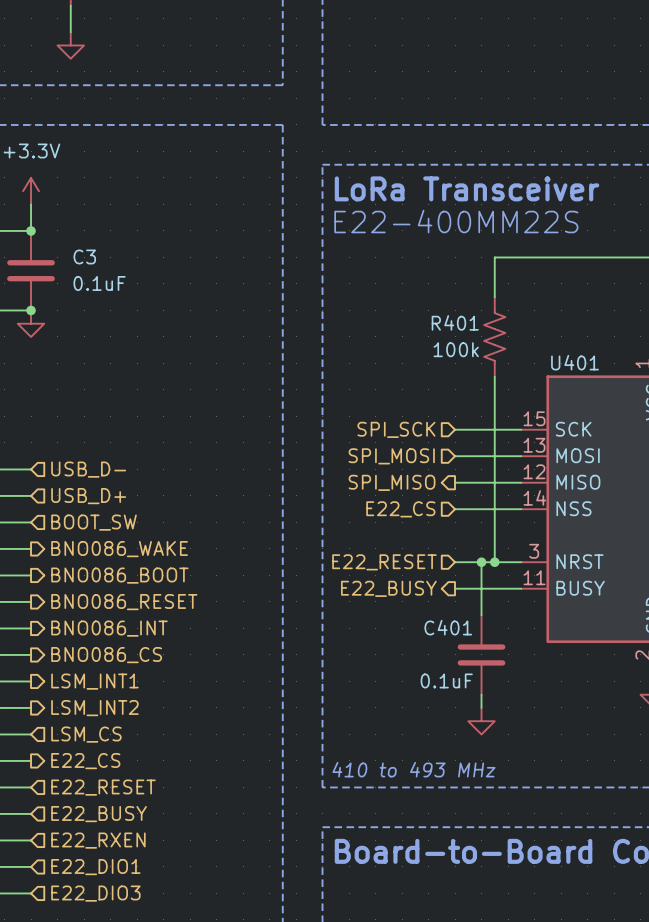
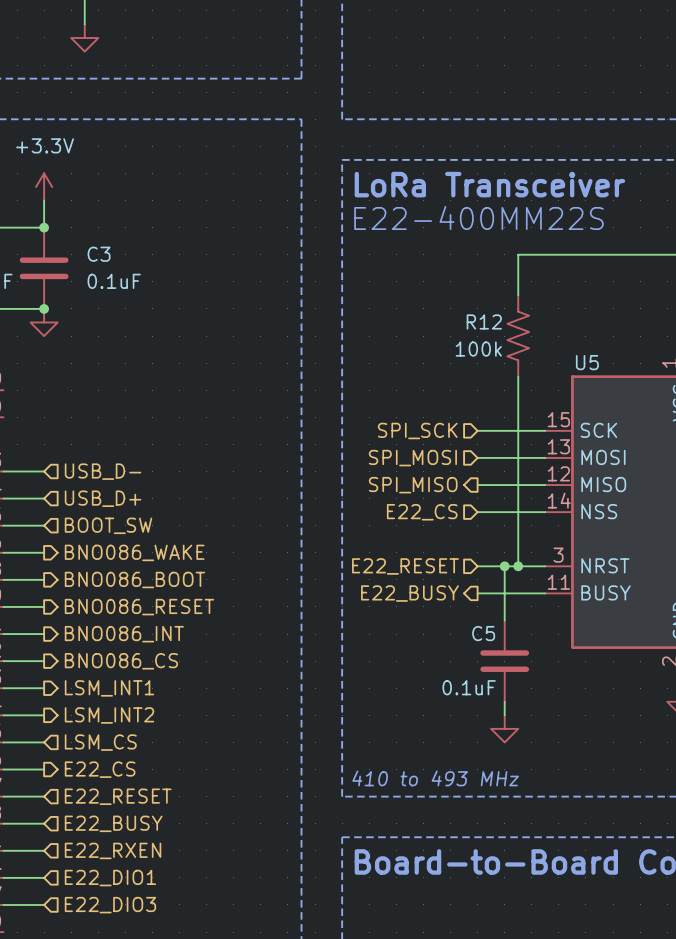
R401 name: R401 (455, 322) -> R12 (484, 321)
U401 name: U401 (574, 362) -> U5 (587, 362)
C401 name: C401 (448, 627) -> C5 (483, 633)

